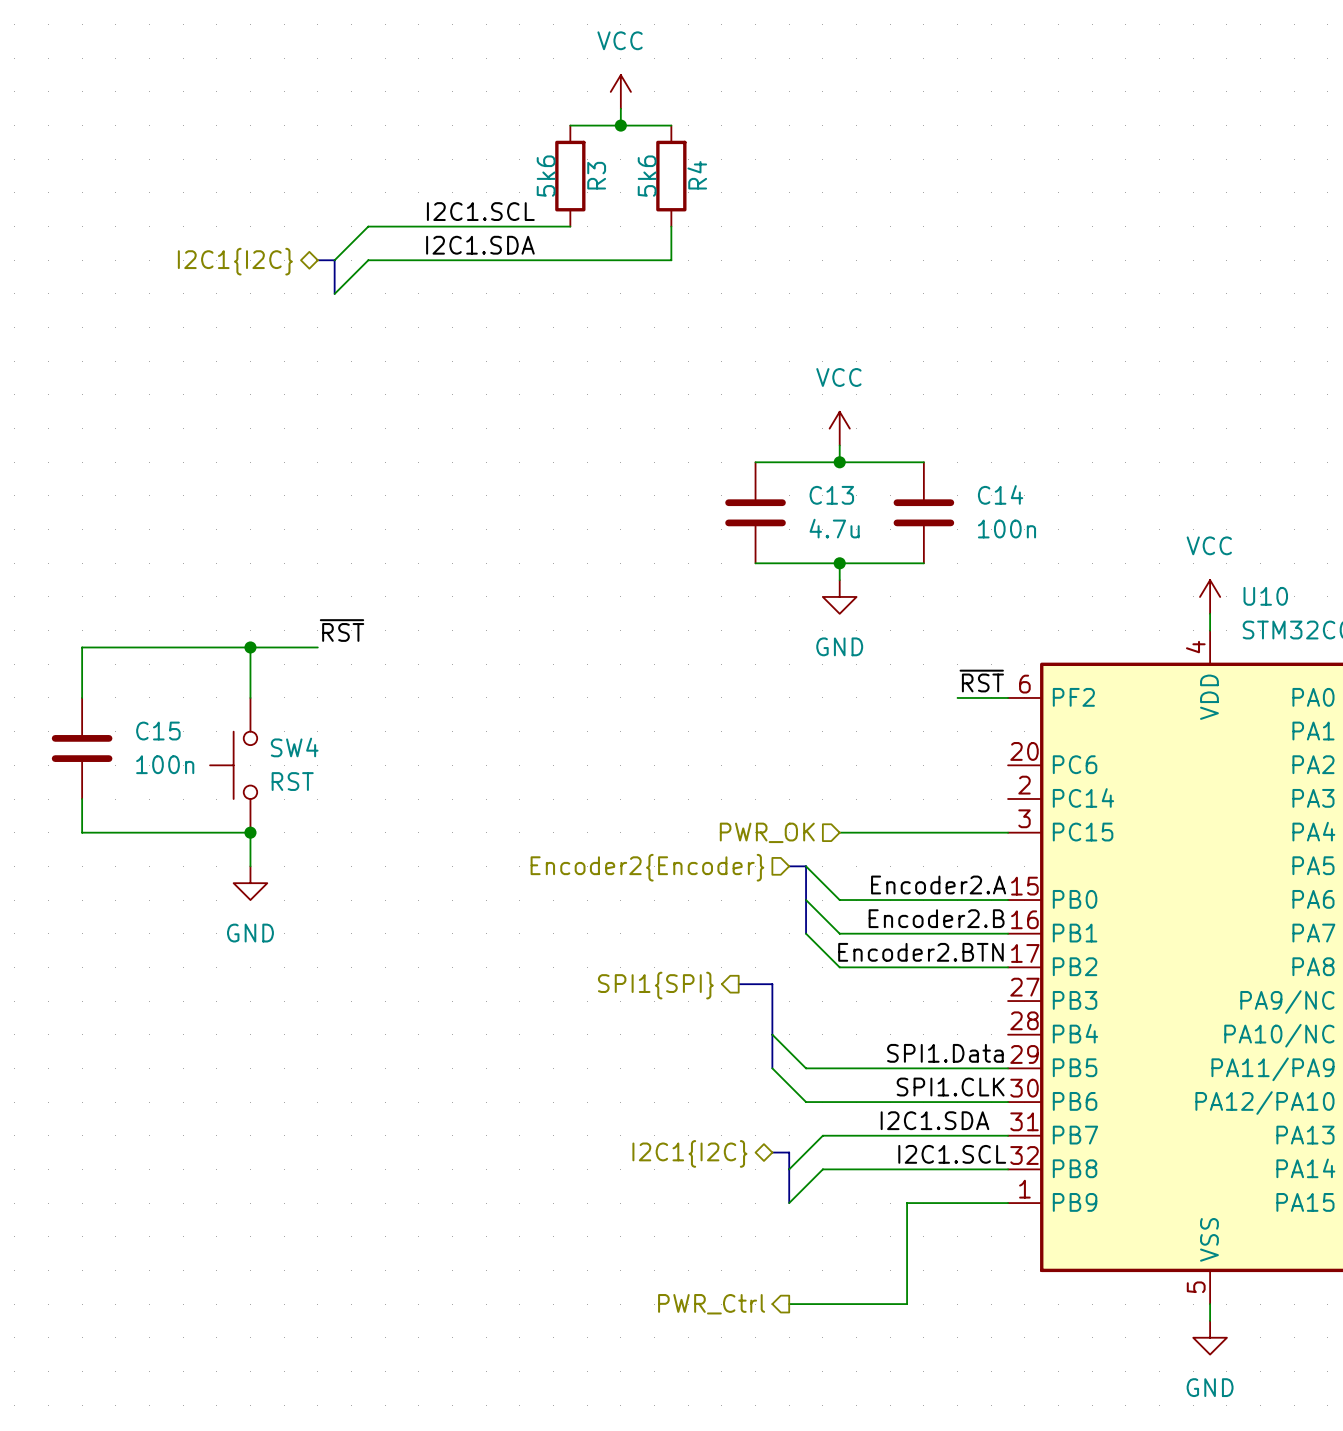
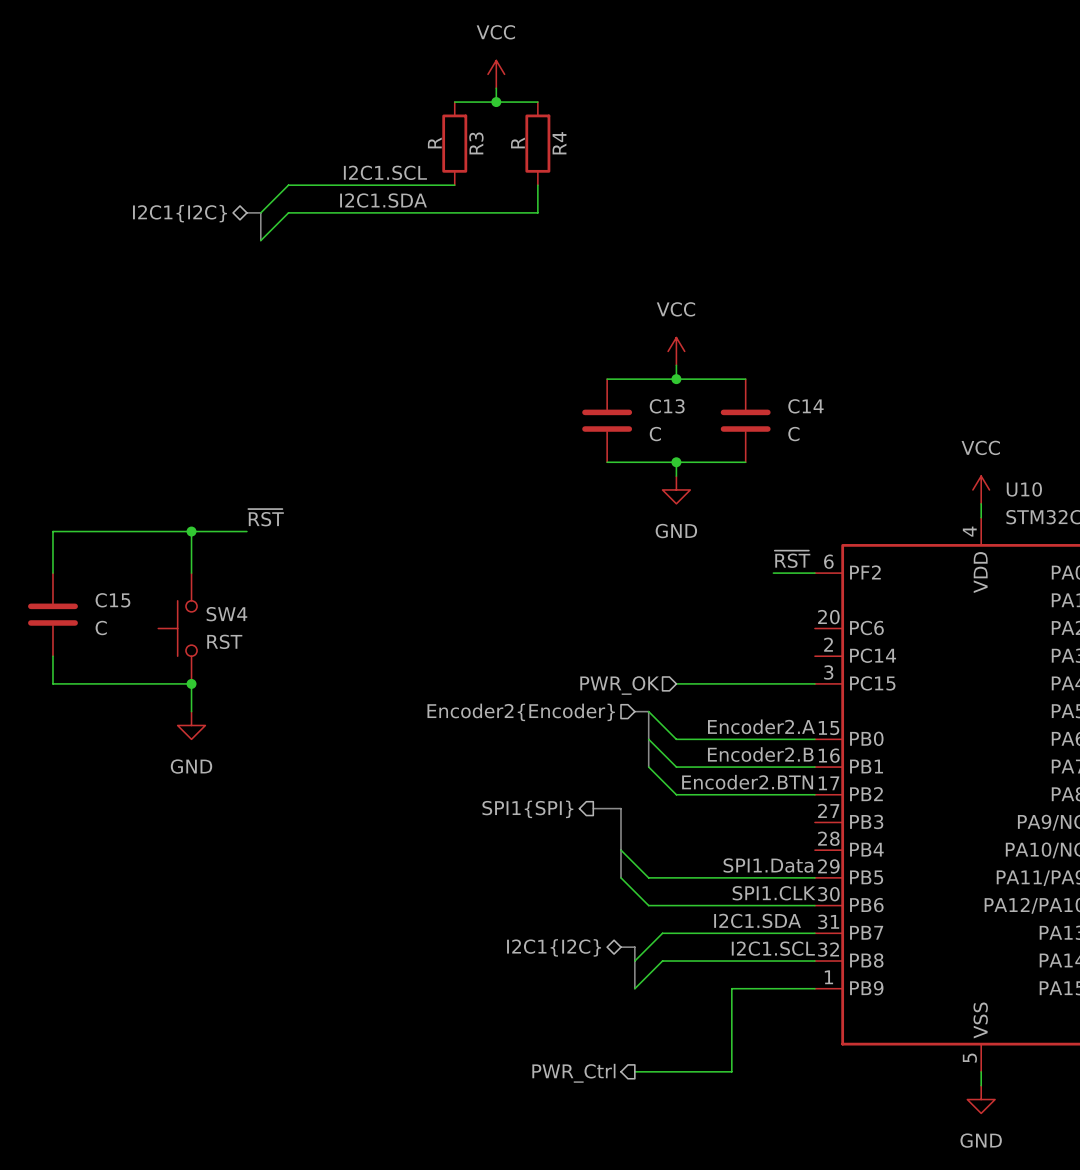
R3 value: 5k6 (546, 176) -> R (434, 142)
R4 value: 5k6 (647, 176) -> R (517, 142)
C13 value: 4.7u (834, 528) -> C (655, 434)
C14 value: 100n (1006, 529) -> C (793, 434)
C15 value: 100n (165, 764) -> C (101, 628)

